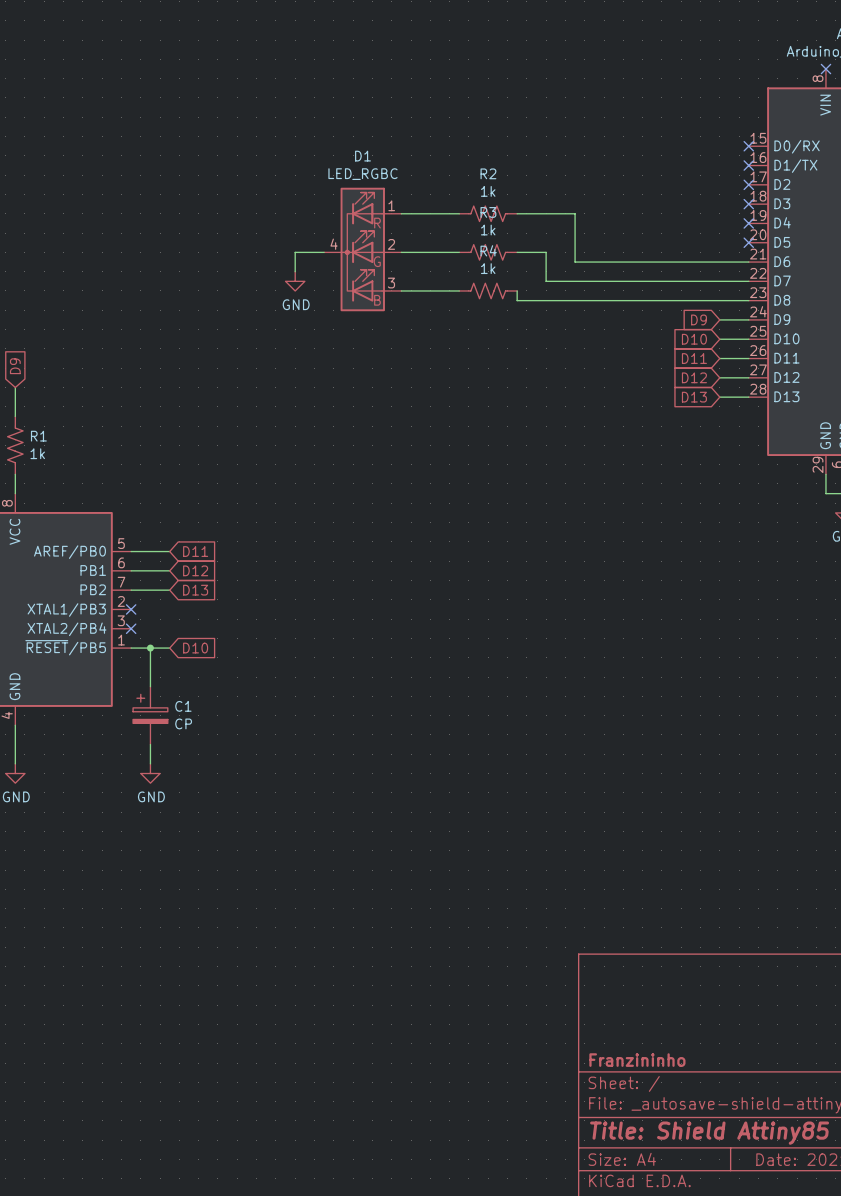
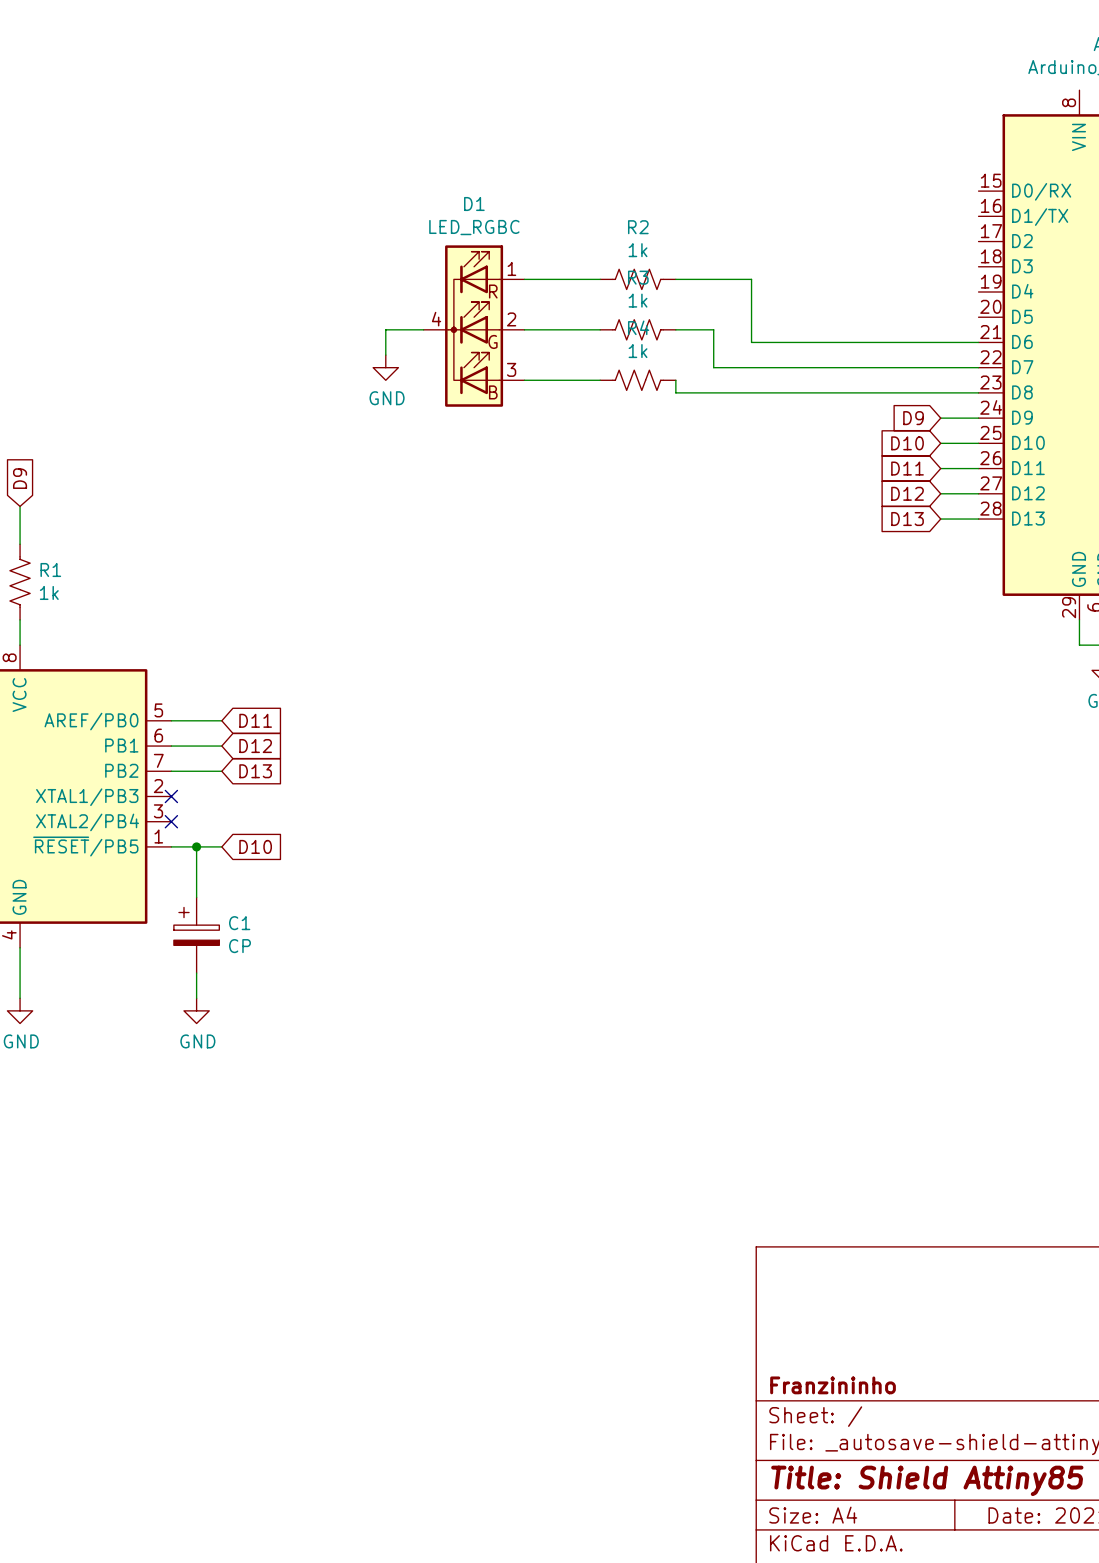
no-connect mark: (825, 69) -> none
no-connect mark: (748, 146) -> none
no-connect mark: (748, 165) -> none
no-connect mark: (748, 184) -> none
no-connect mark: (748, 204) -> none
no-connect mark: (748, 223) -> none
no-connect mark: (748, 242) -> none

